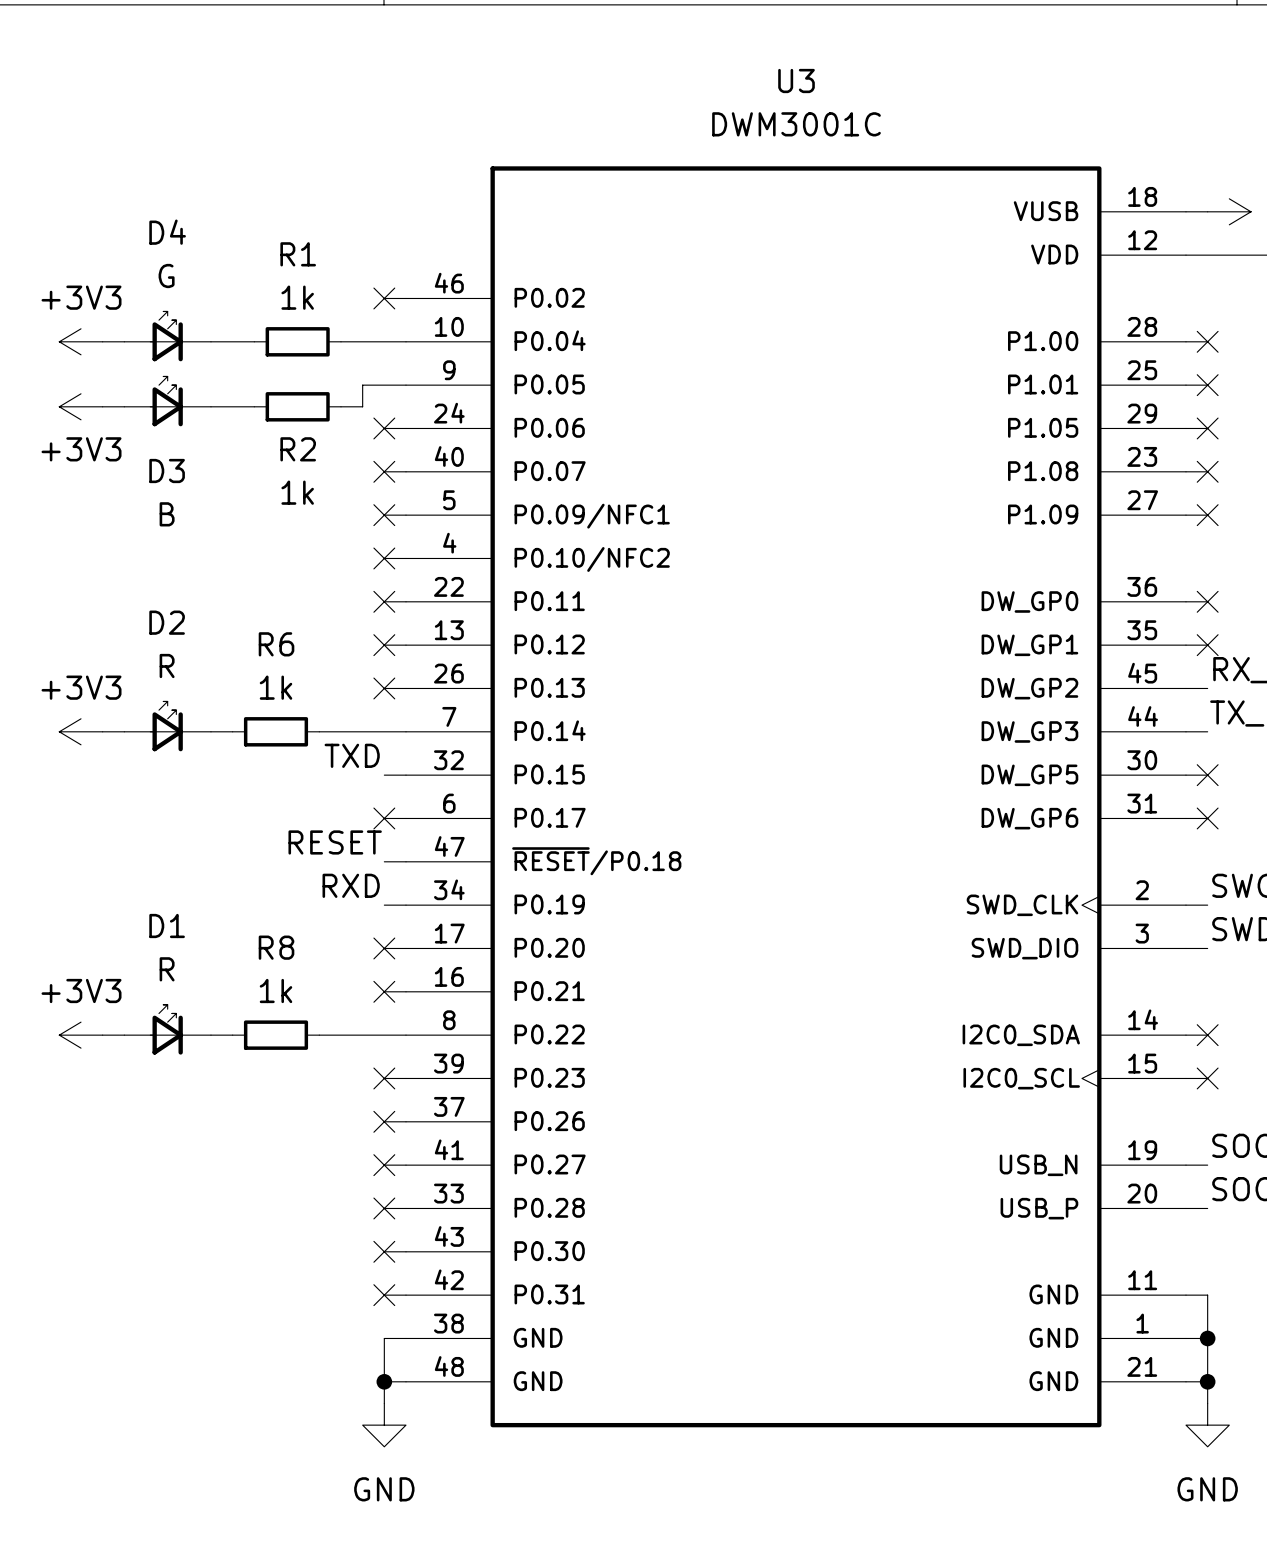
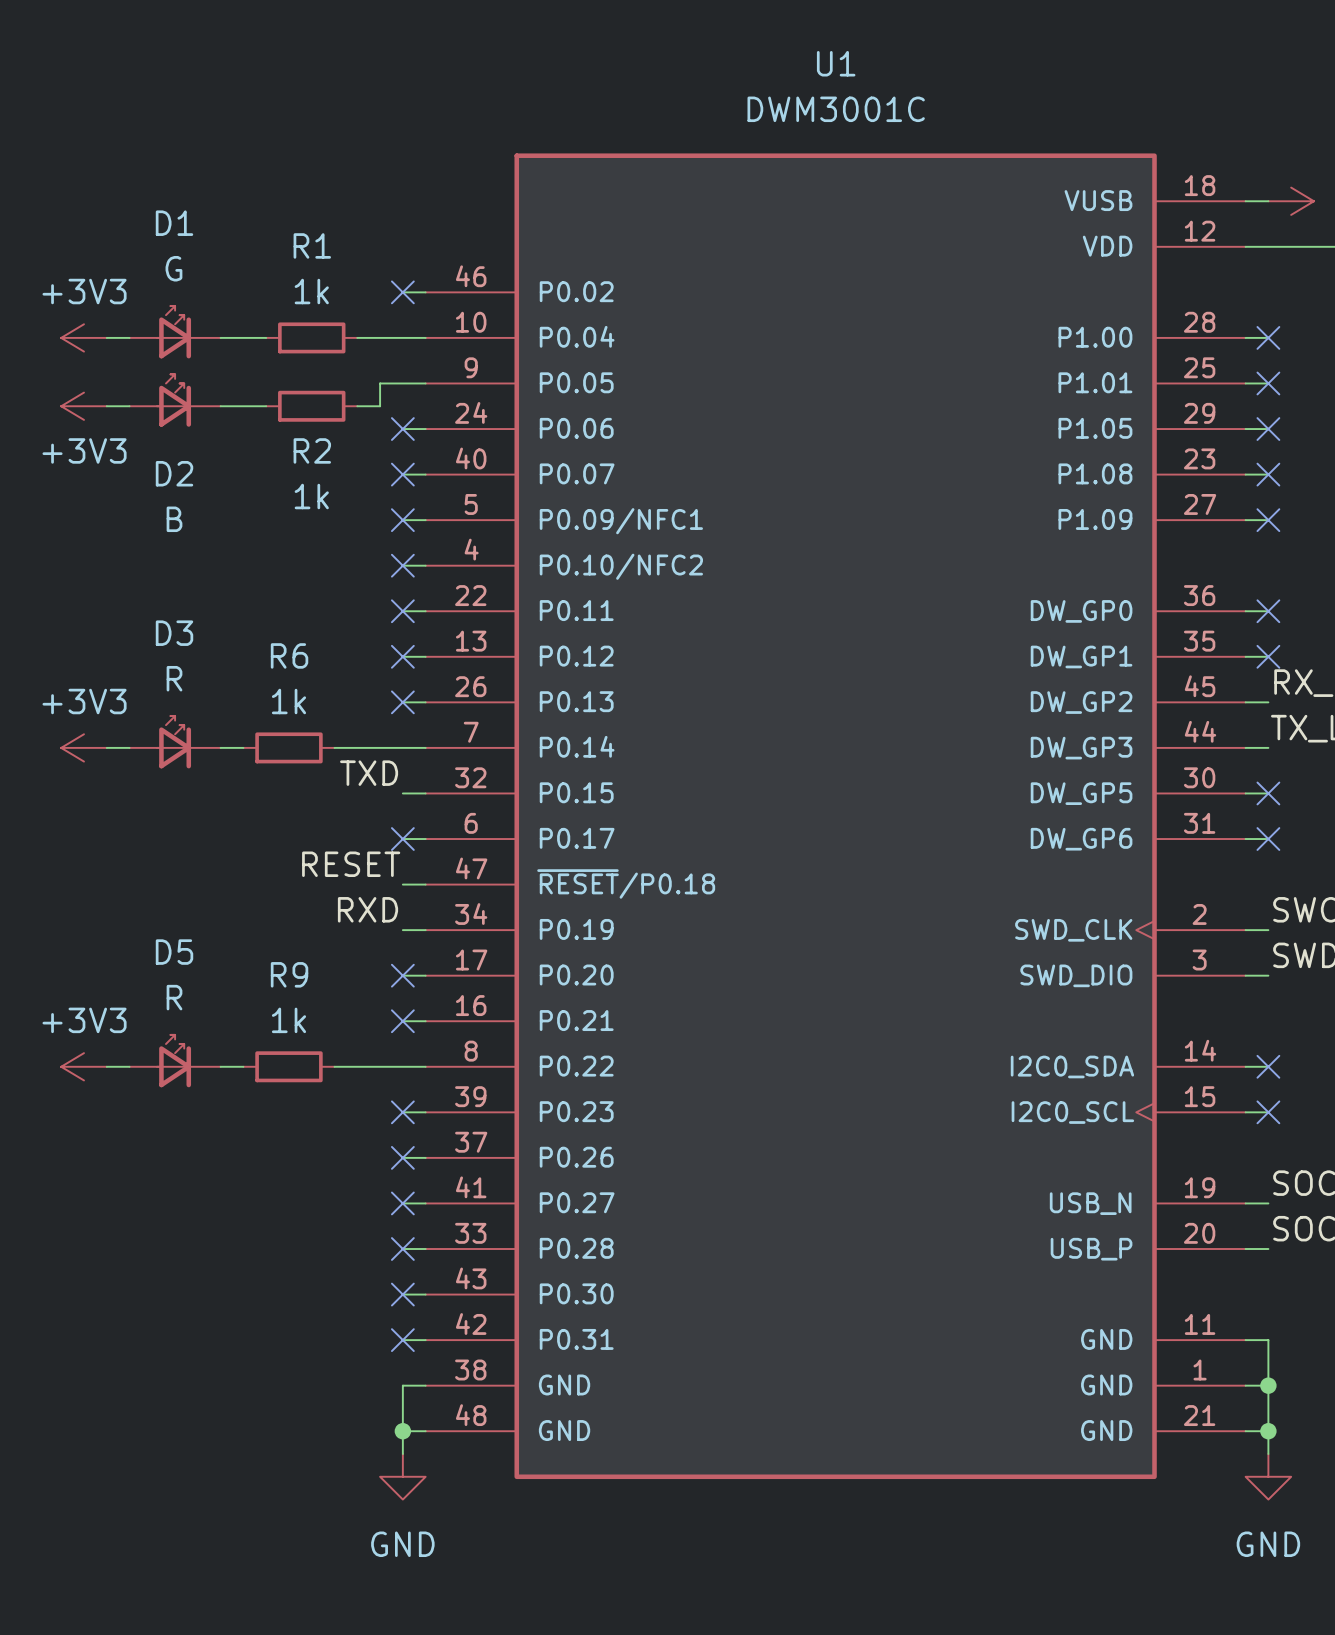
U3 name: U3 (796, 81) -> U1 (836, 63)
D4 name: D4 (167, 232) -> D1 (174, 223)
D3 name: D3 (167, 471) -> D2 (174, 473)
D2 name: D2 (167, 622) -> D3 (174, 633)
D1 name: D1 (167, 926) -> D5 (174, 952)
R8 name: R8 (276, 947) -> R9 (289, 974)

